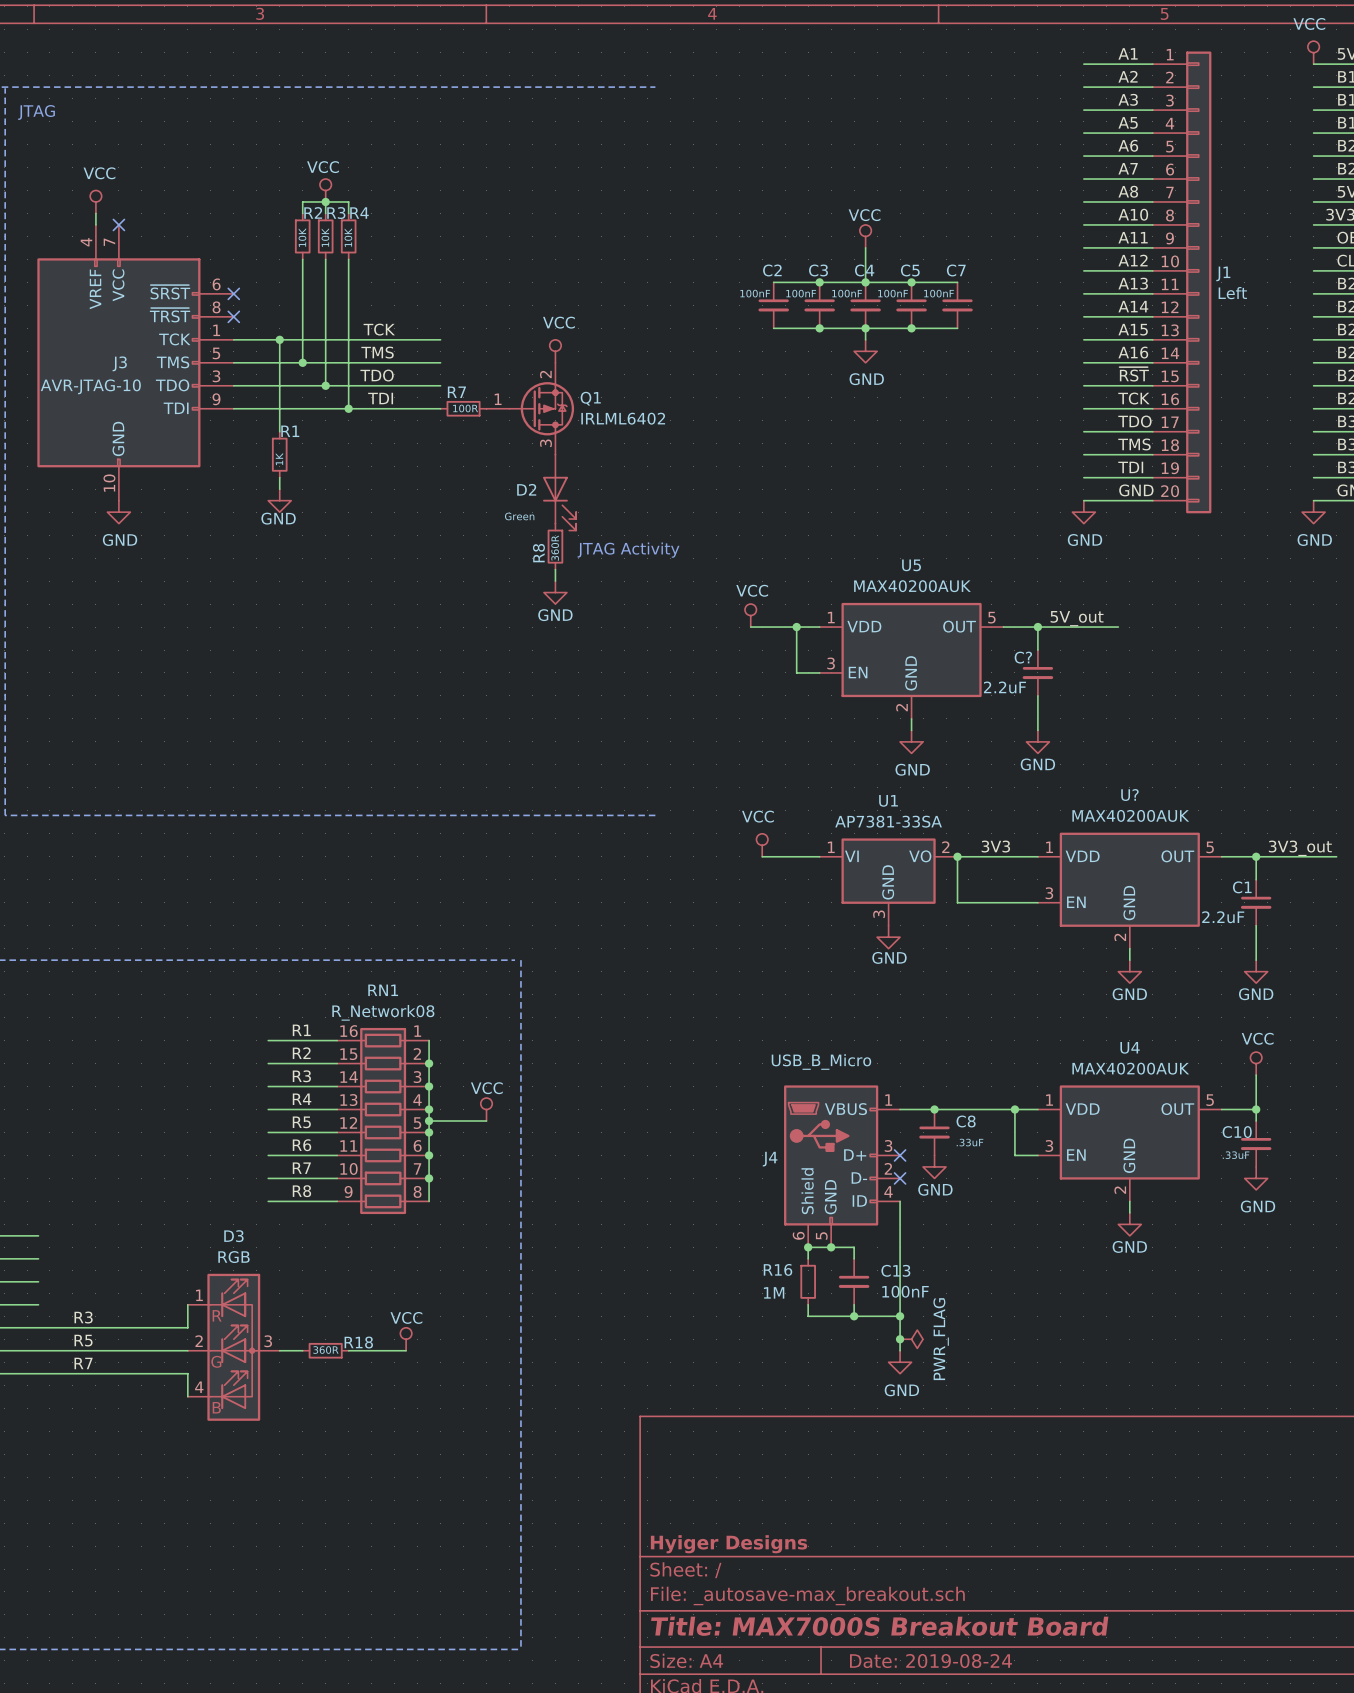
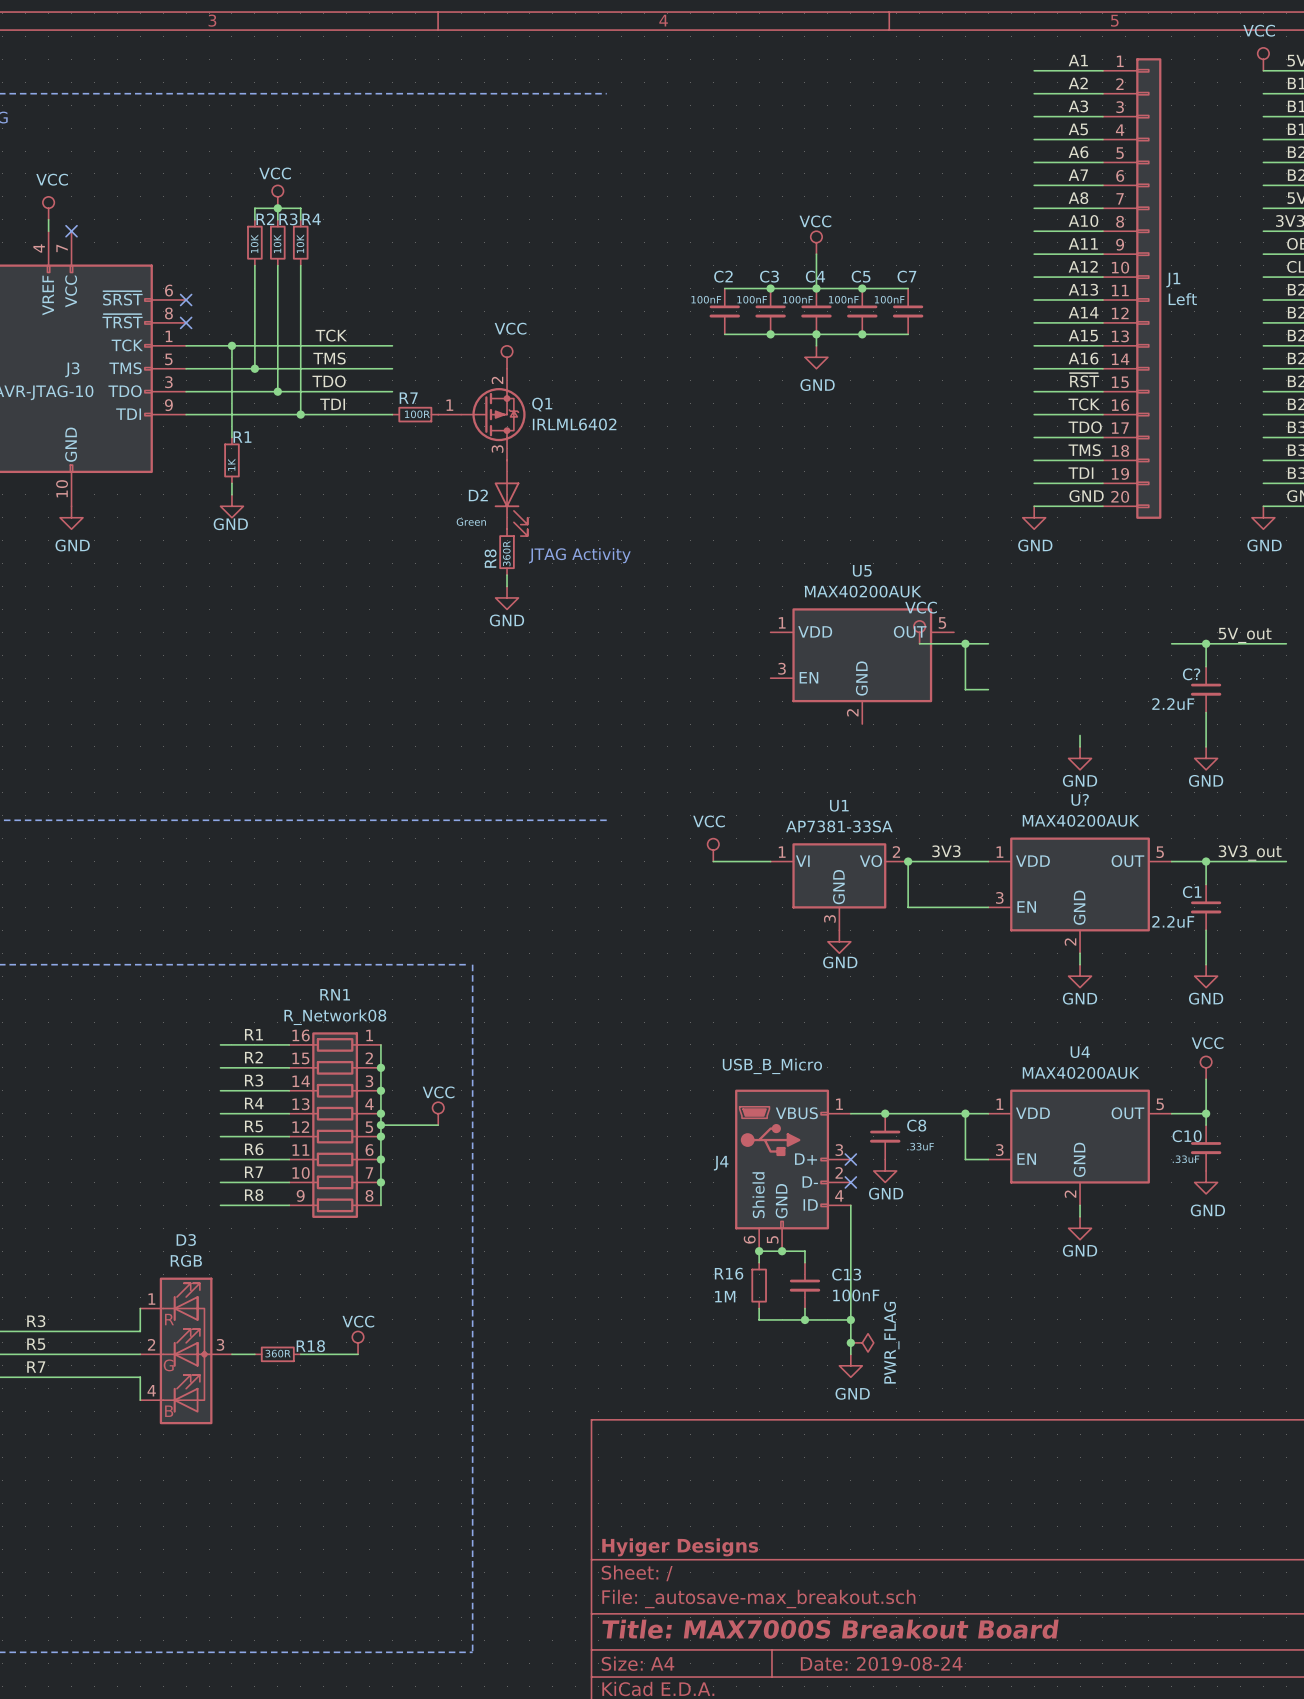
power symbol position: VCC (750, 615) -> VCC (919, 632)
label position: 5V_out (1077, 618) -> 5V_out (1245, 635)
wire: (750, 627) (819, 627) -> (919, 643) (988, 643)
wire: (796, 627) (796, 672) (819, 672) -> (965, 643) (965, 689) (988, 689)
junction: (796, 627) -> none
wire: (1003, 627) (1118, 627) -> (1171, 643) (1286, 643)
wire: (1037, 627) (1037, 650) -> (1206, 643) (1206, 666)
junction position: (1037, 627) -> (965, 643)
junction: none -> (1206, 643)
C? position: (1037, 672) -> (1206, 689)
wire: (1037, 695) (1037, 730) -> (1206, 712) (1206, 746)
wire: (911, 718) (911, 730) -> (1080, 735) (1080, 746)
power symbol: GND (911, 741) -> none
power symbol position: GND (1037, 741) -> GND (1080, 758)
power symbol: none -> GND (1206, 758)

